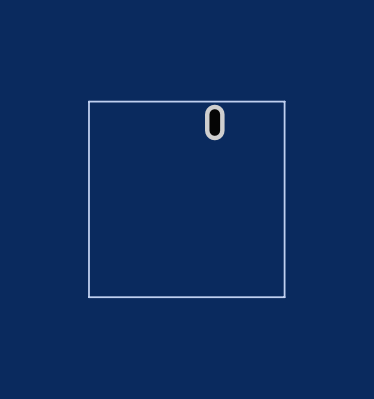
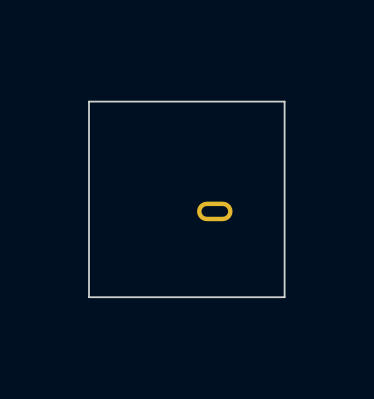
part rotation: 0° (214, 122) -> 90° clockwise (214, 211)
part position: (214, 122) -> (214, 211)

